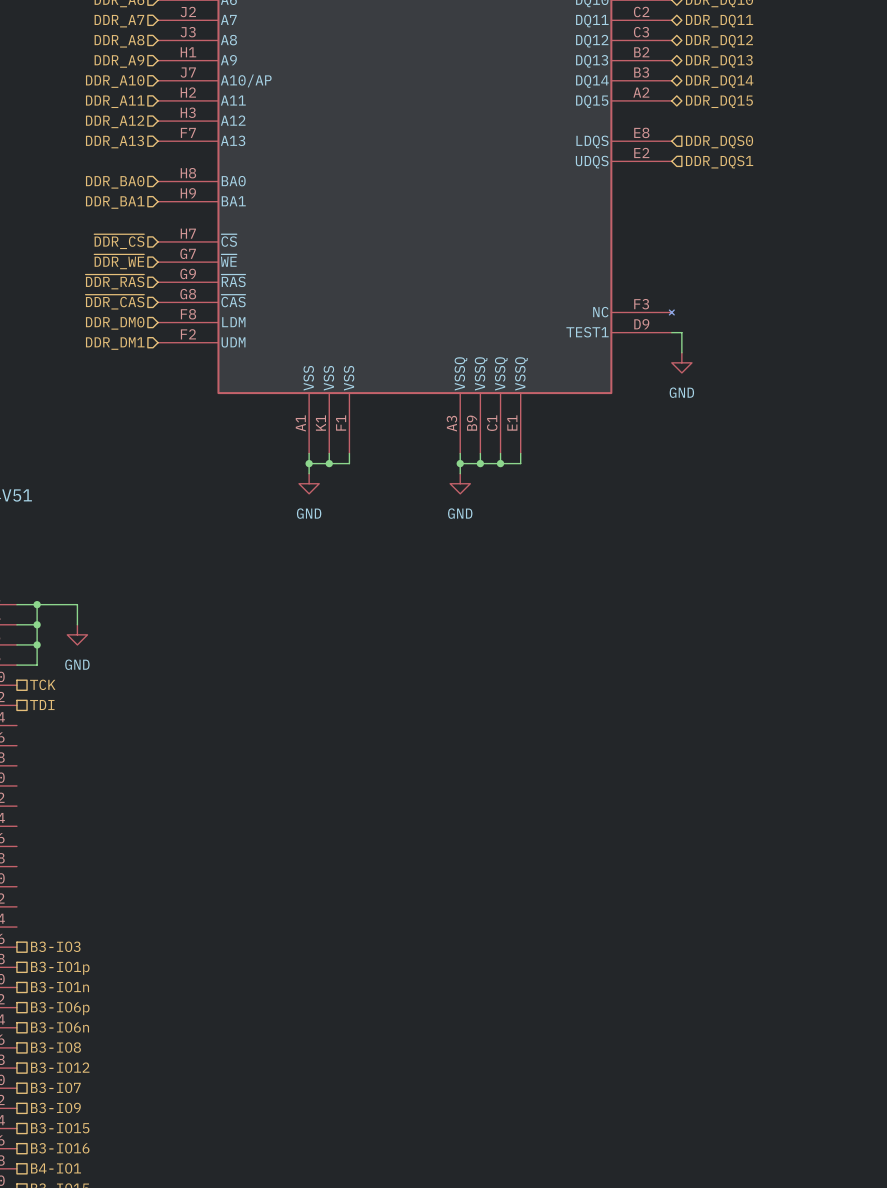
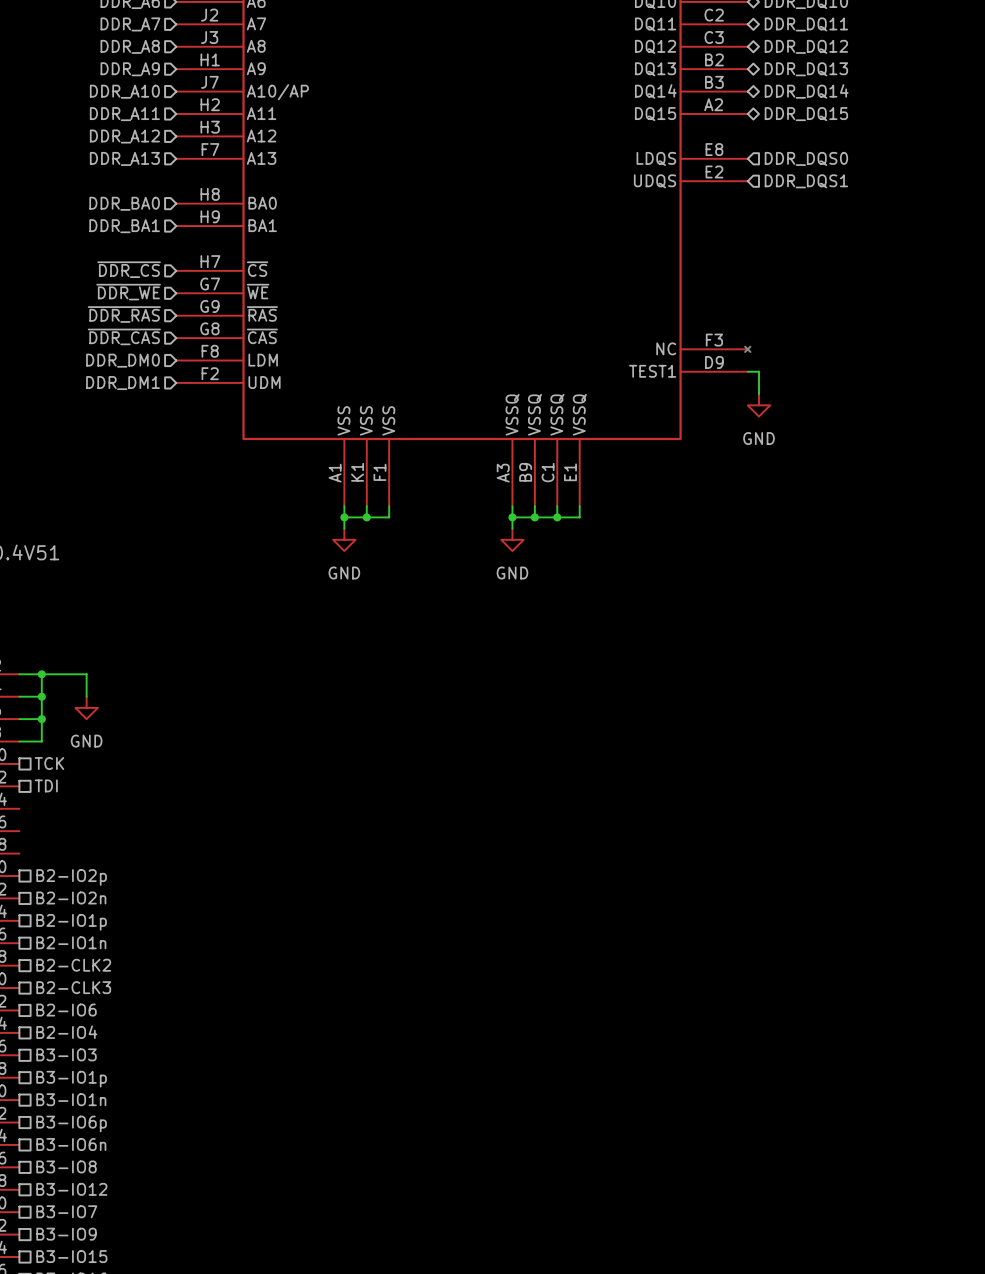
hierarchical label: none -> B2-IO2p (71, 877)
hierarchical label: none -> B2-IO2n (71, 897)
hierarchical label: none -> B2-IO1p (71, 922)
hierarchical label: none -> B2-IO1n (71, 942)
hierarchical label: none -> B2-CLK2 (73, 965)
hierarchical label: none -> B2-CLK3 (73, 987)
hierarchical label: none -> B2-IO6 (66, 1010)
hierarchical label: none -> B2-IO4 (66, 1032)

